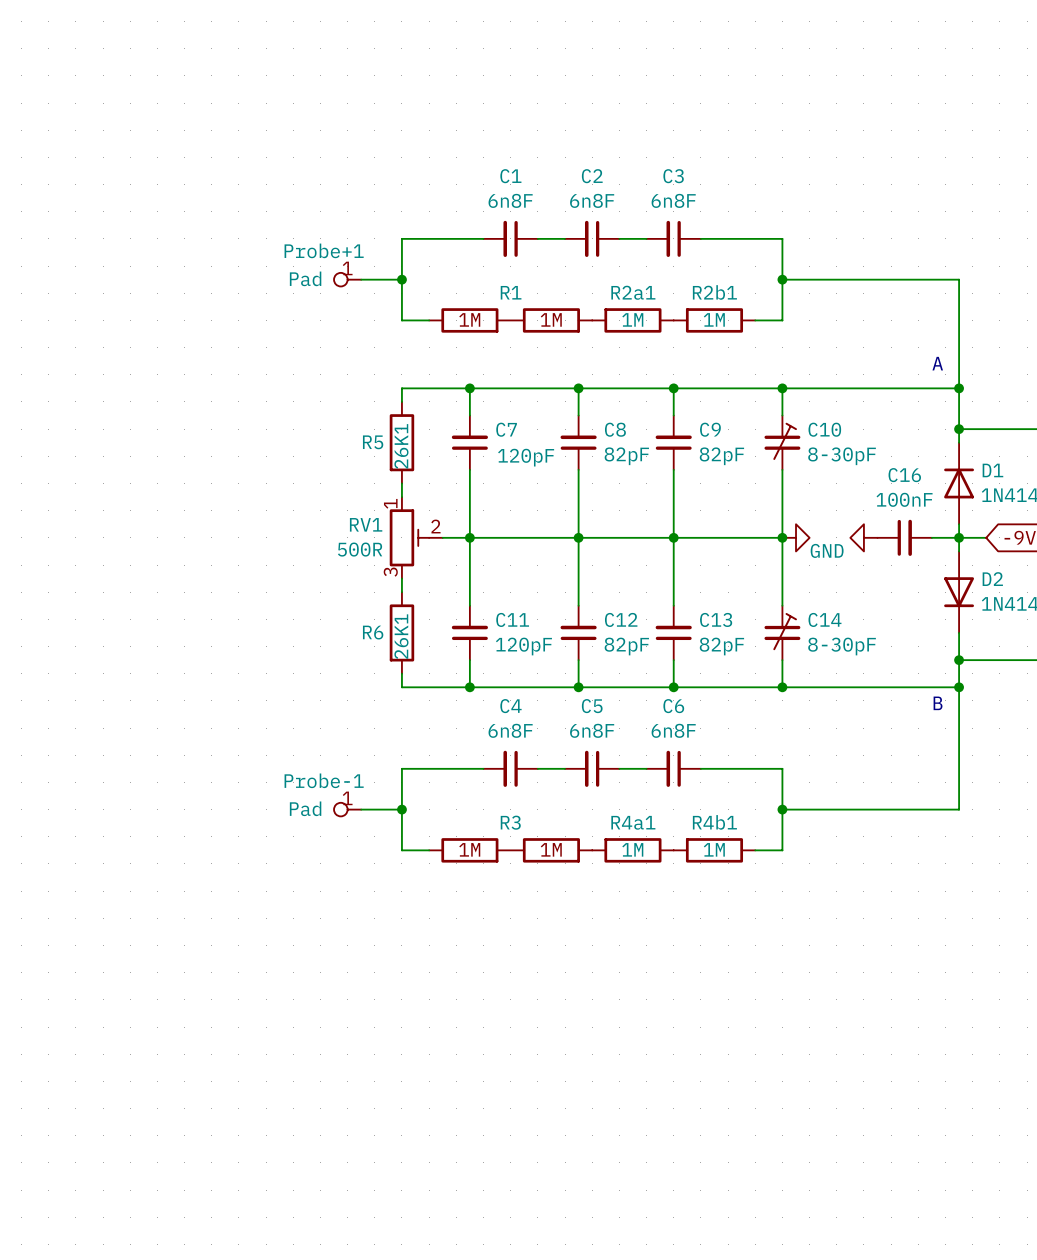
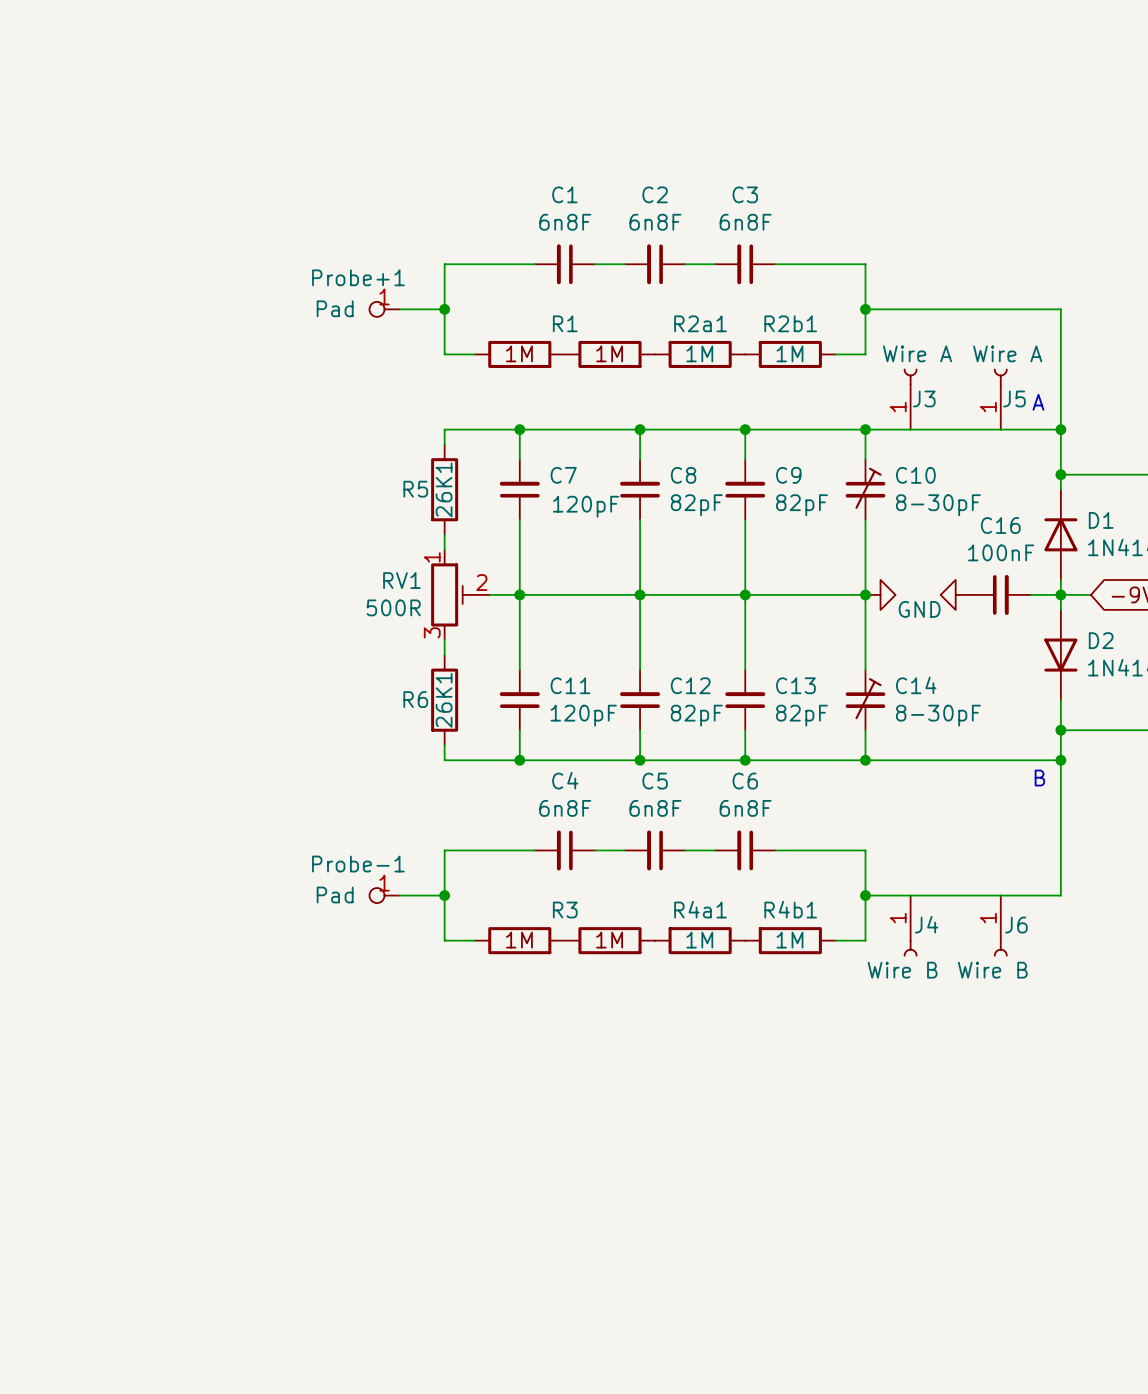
J3: none -> Wire A (910, 399)
J5: none -> Wire A (1000, 399)
J4: none -> Wire B (910, 926)
J6: none -> Wire B (1000, 926)

